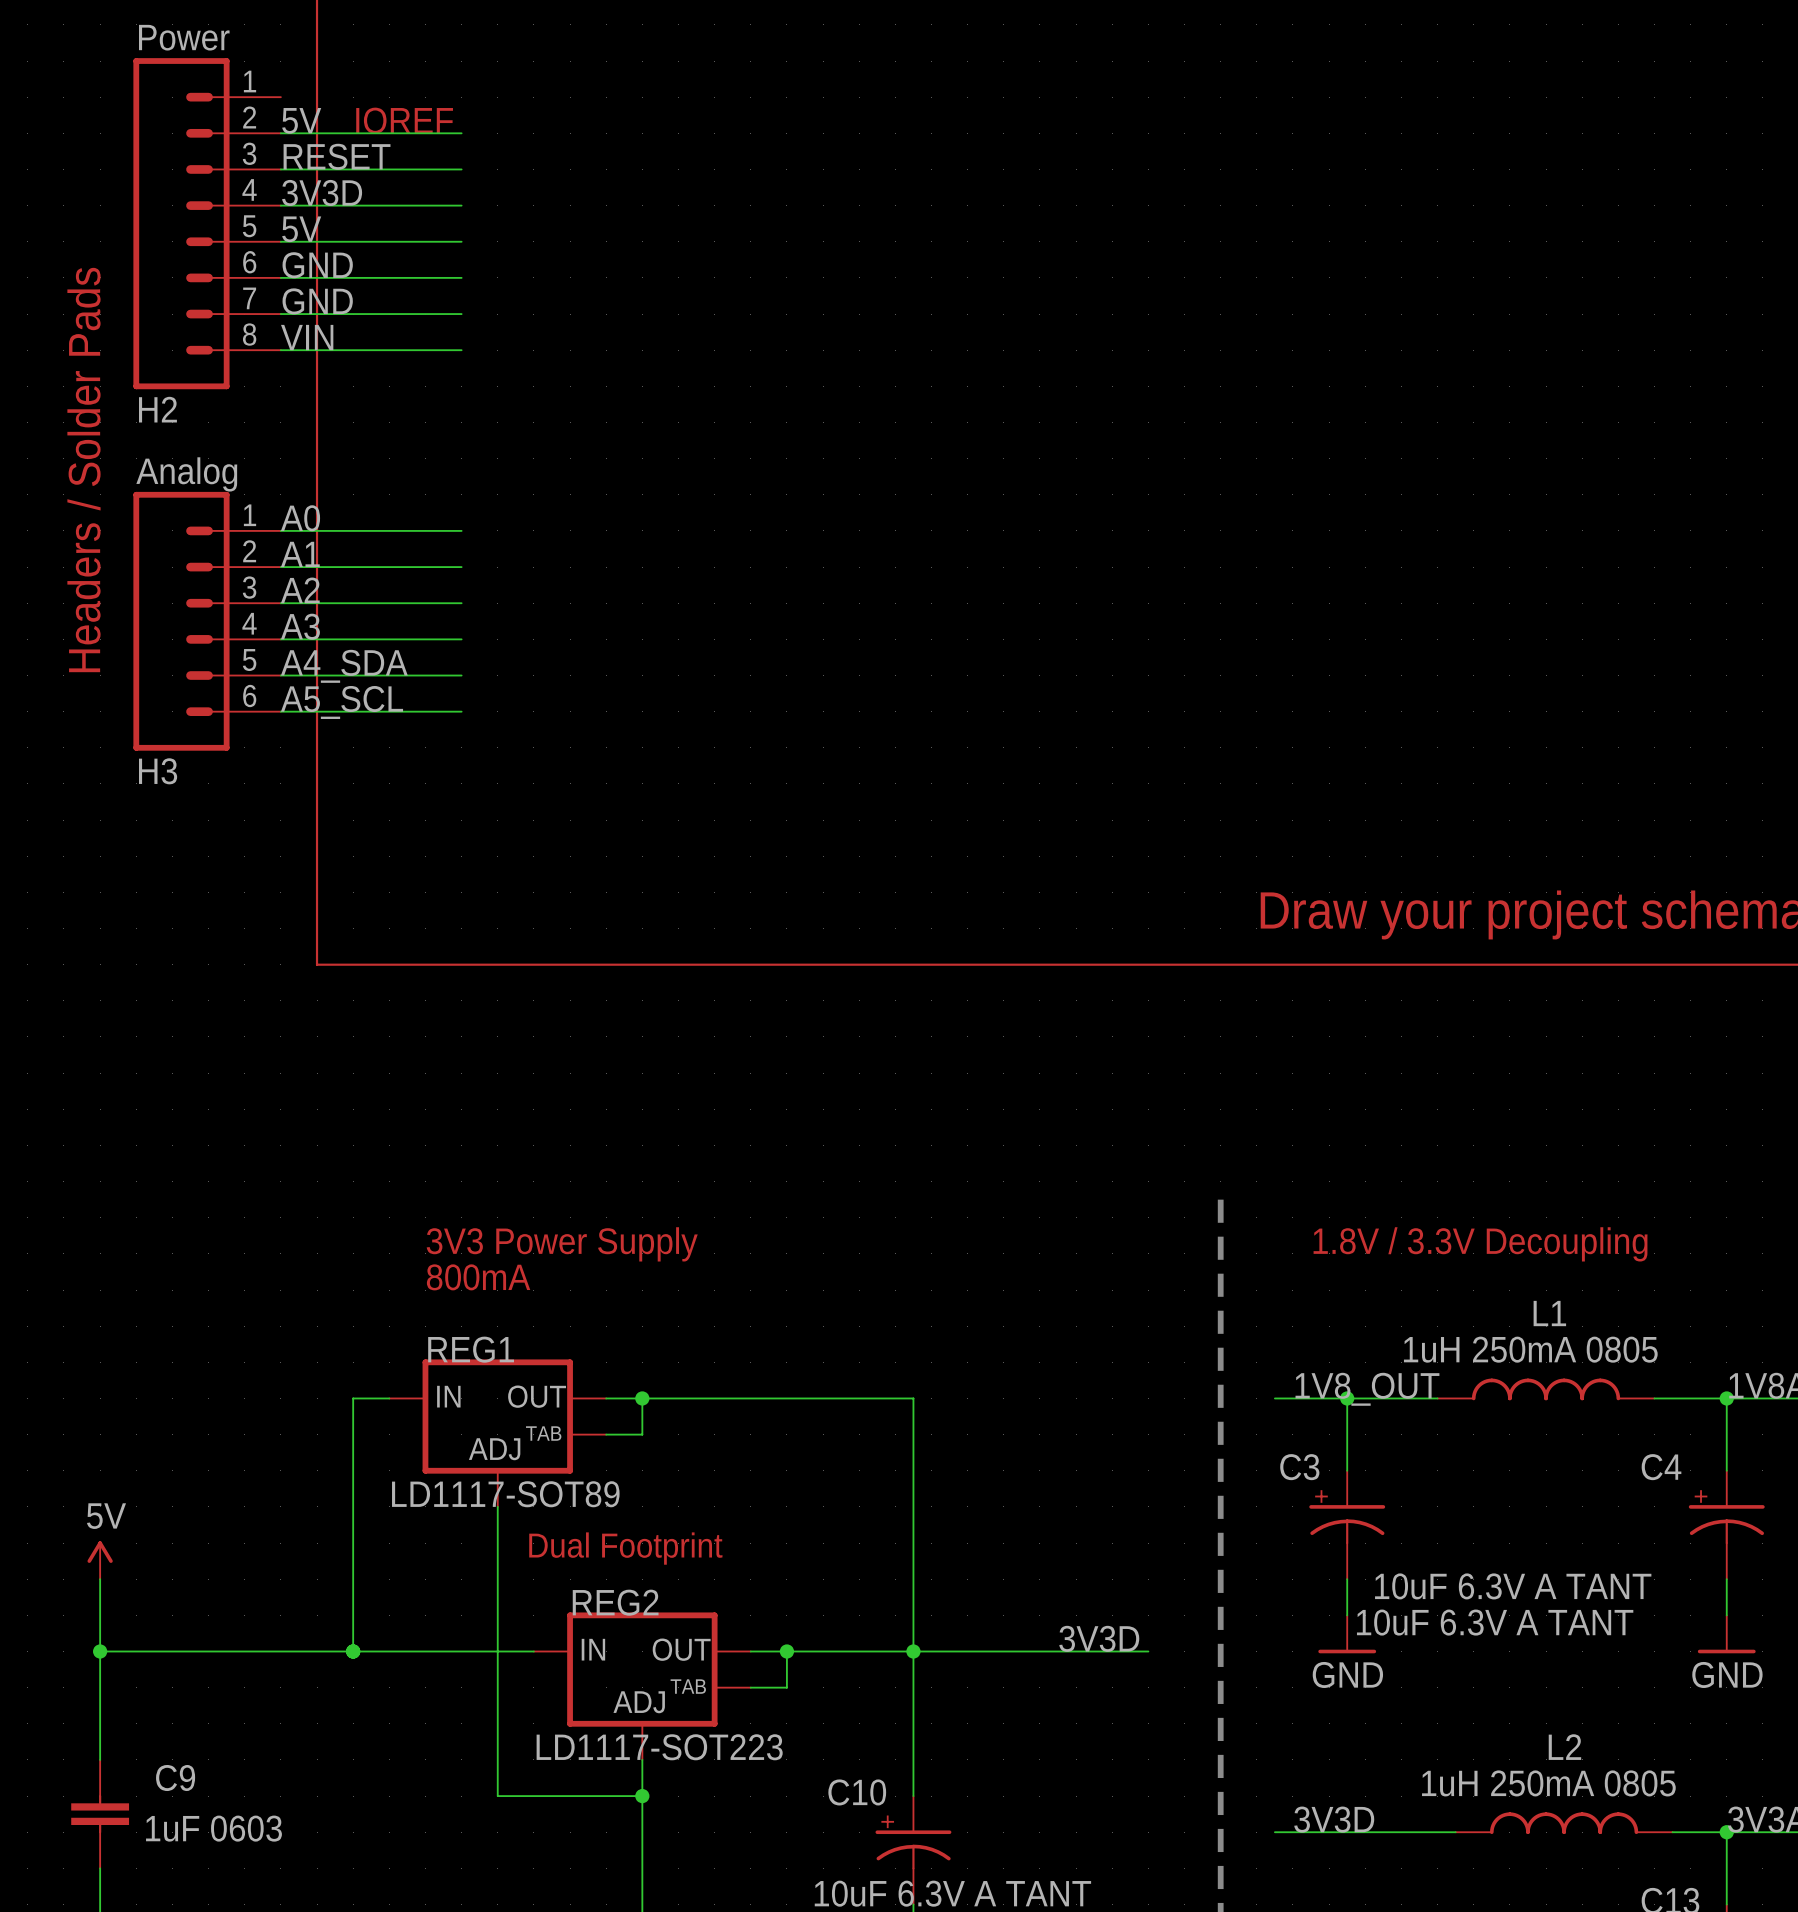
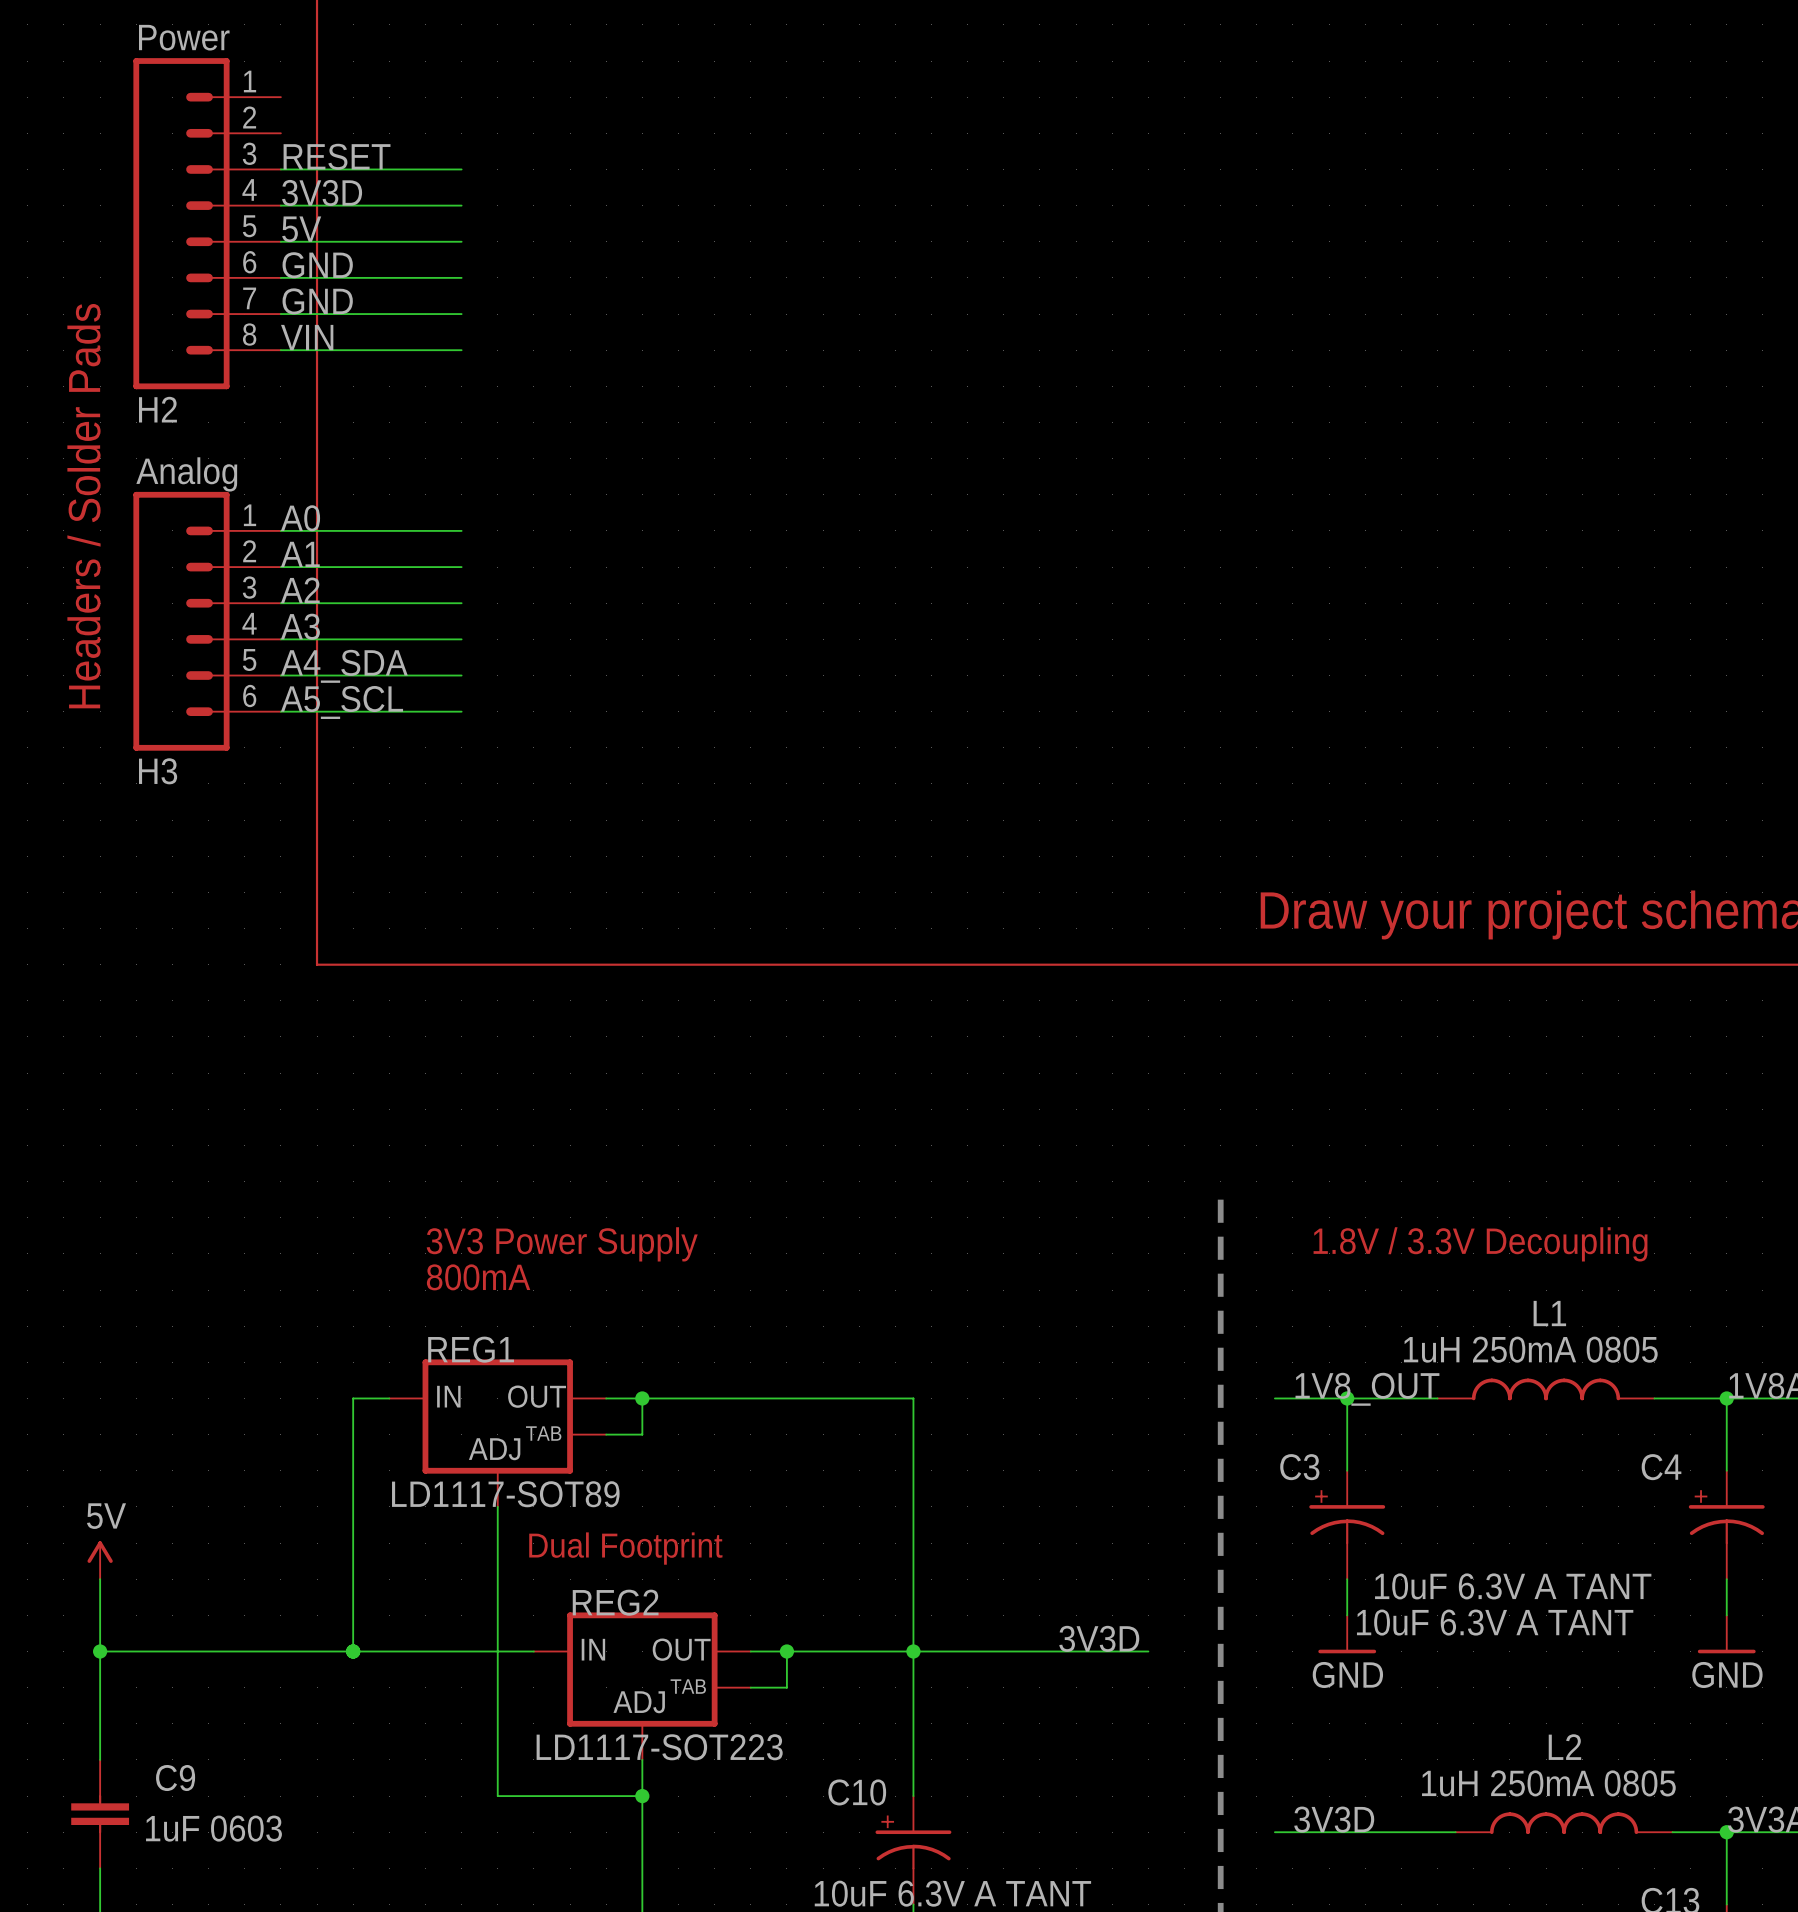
label: 5V (301, 120) -> none
text: IOREF (404, 120) -> none
wire: (280, 133) (461, 133) -> none
text position: Headers / Solder Pads (83, 470) -> Headers / Solder Pads (83, 506)

